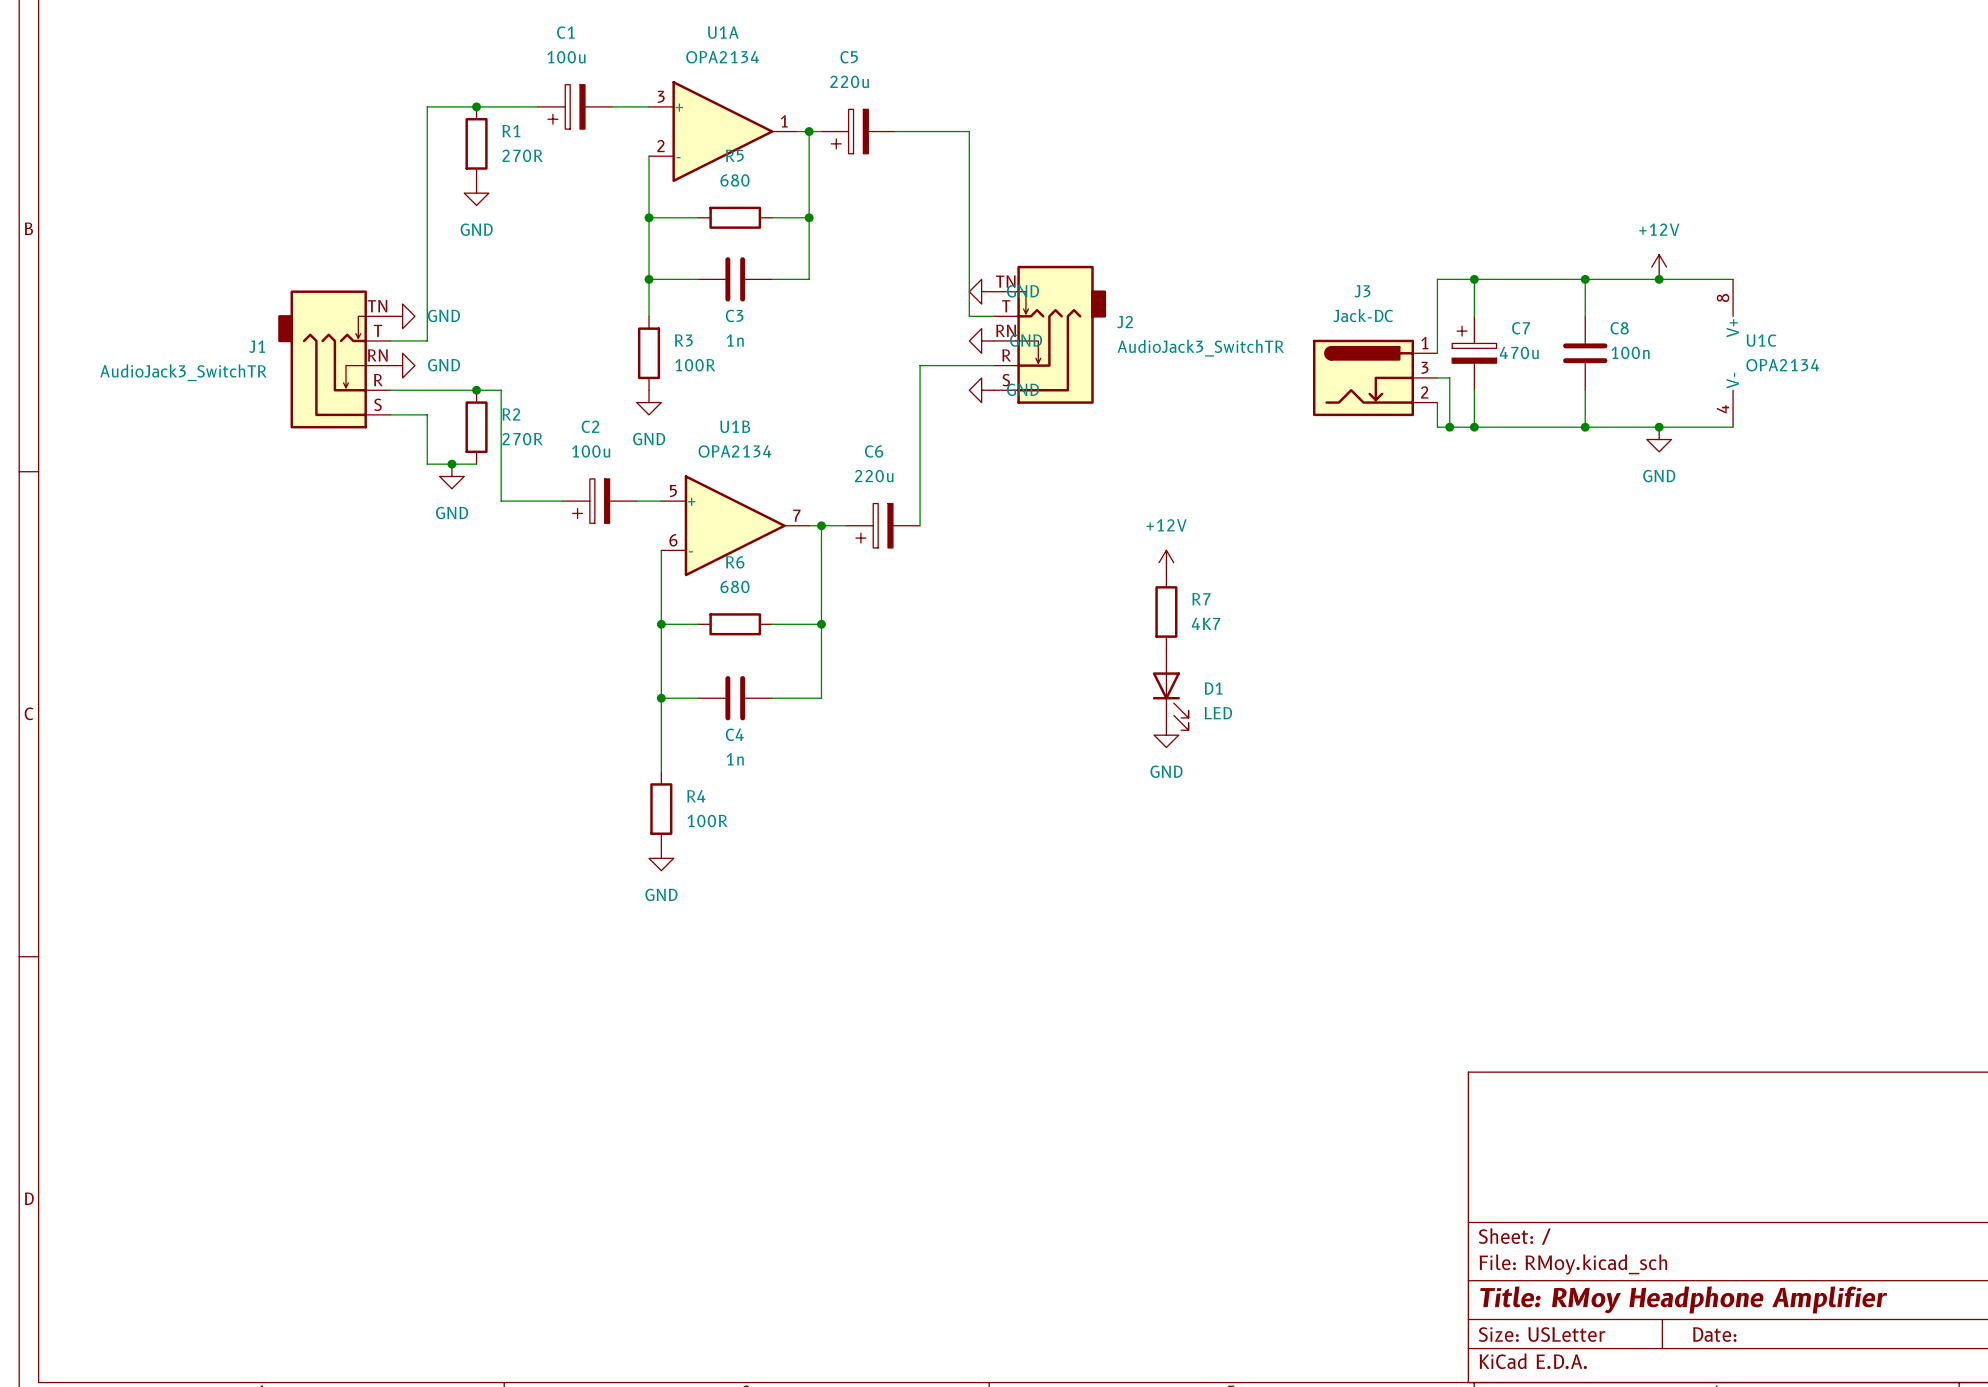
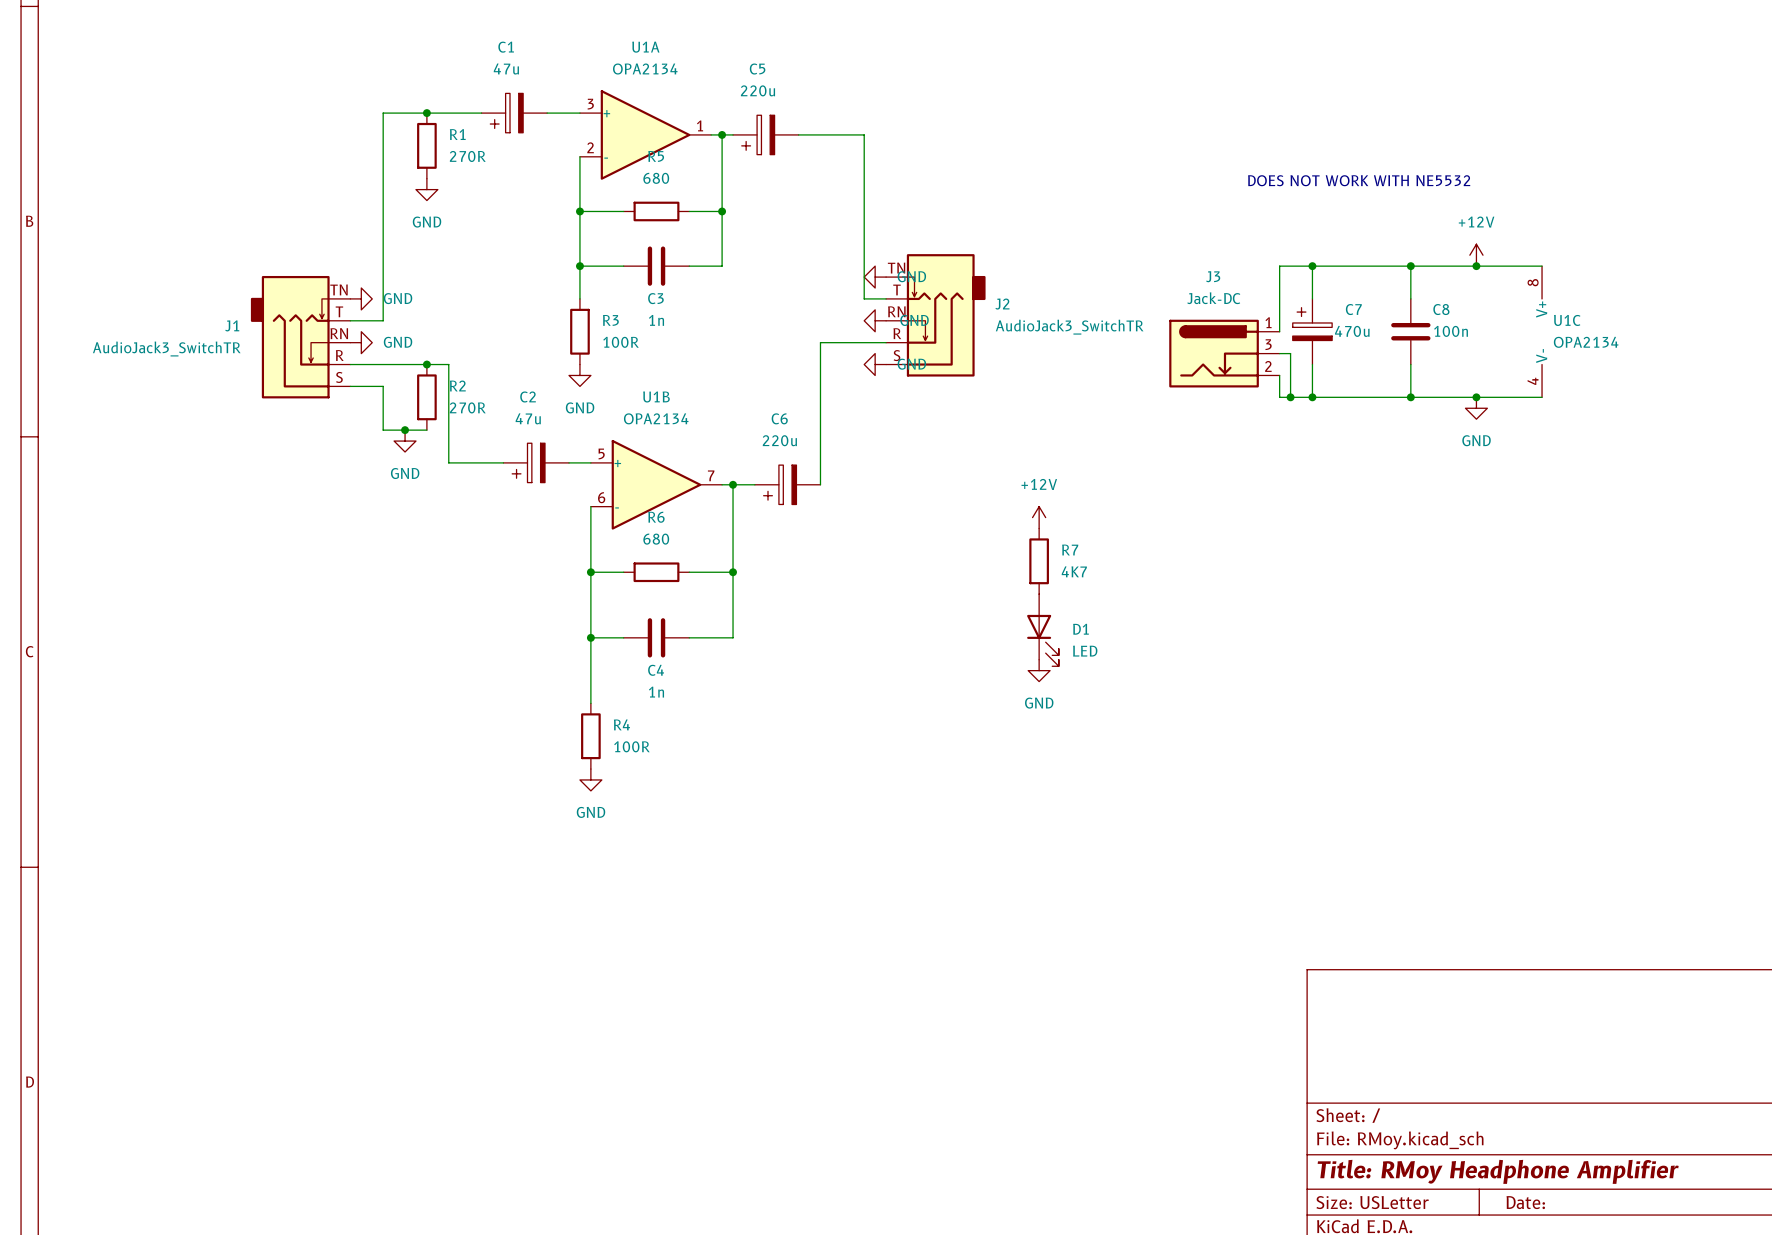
C1 value: 100u (566, 57) -> 47u (506, 69)
text: none -> DOES NOT WORK WITH NE5532 (1359, 180)
C2 value: 100u (591, 451) -> 47u (528, 418)

